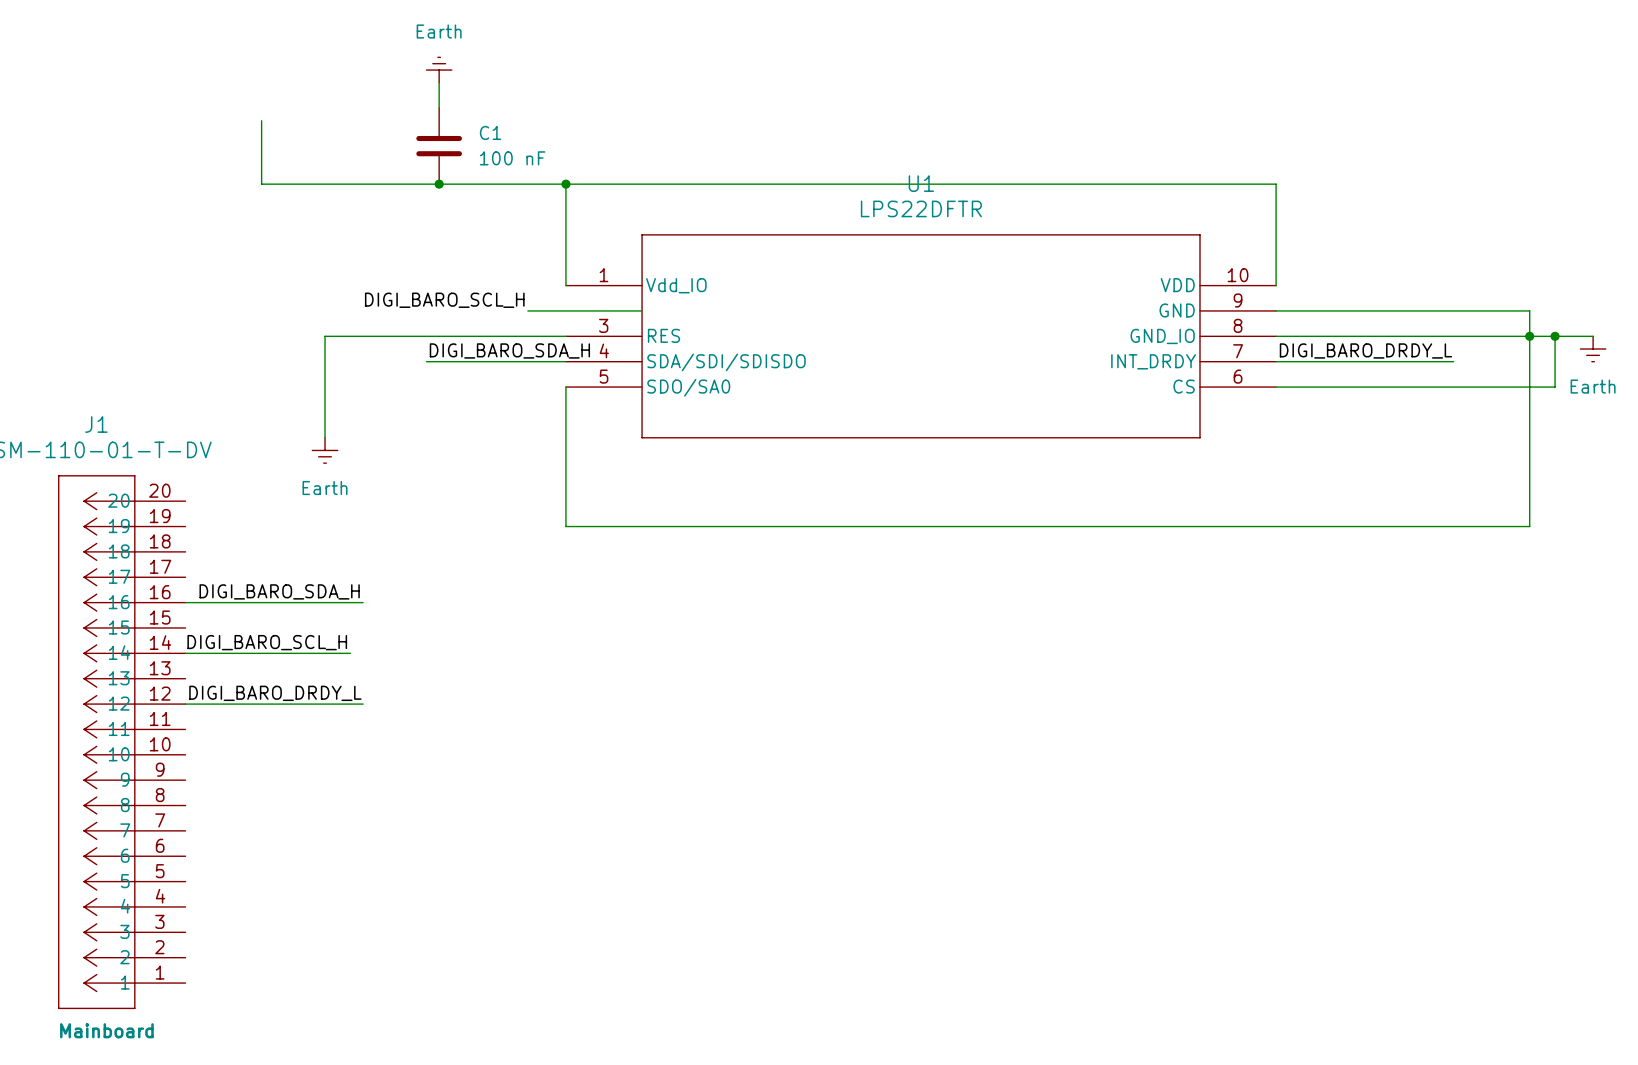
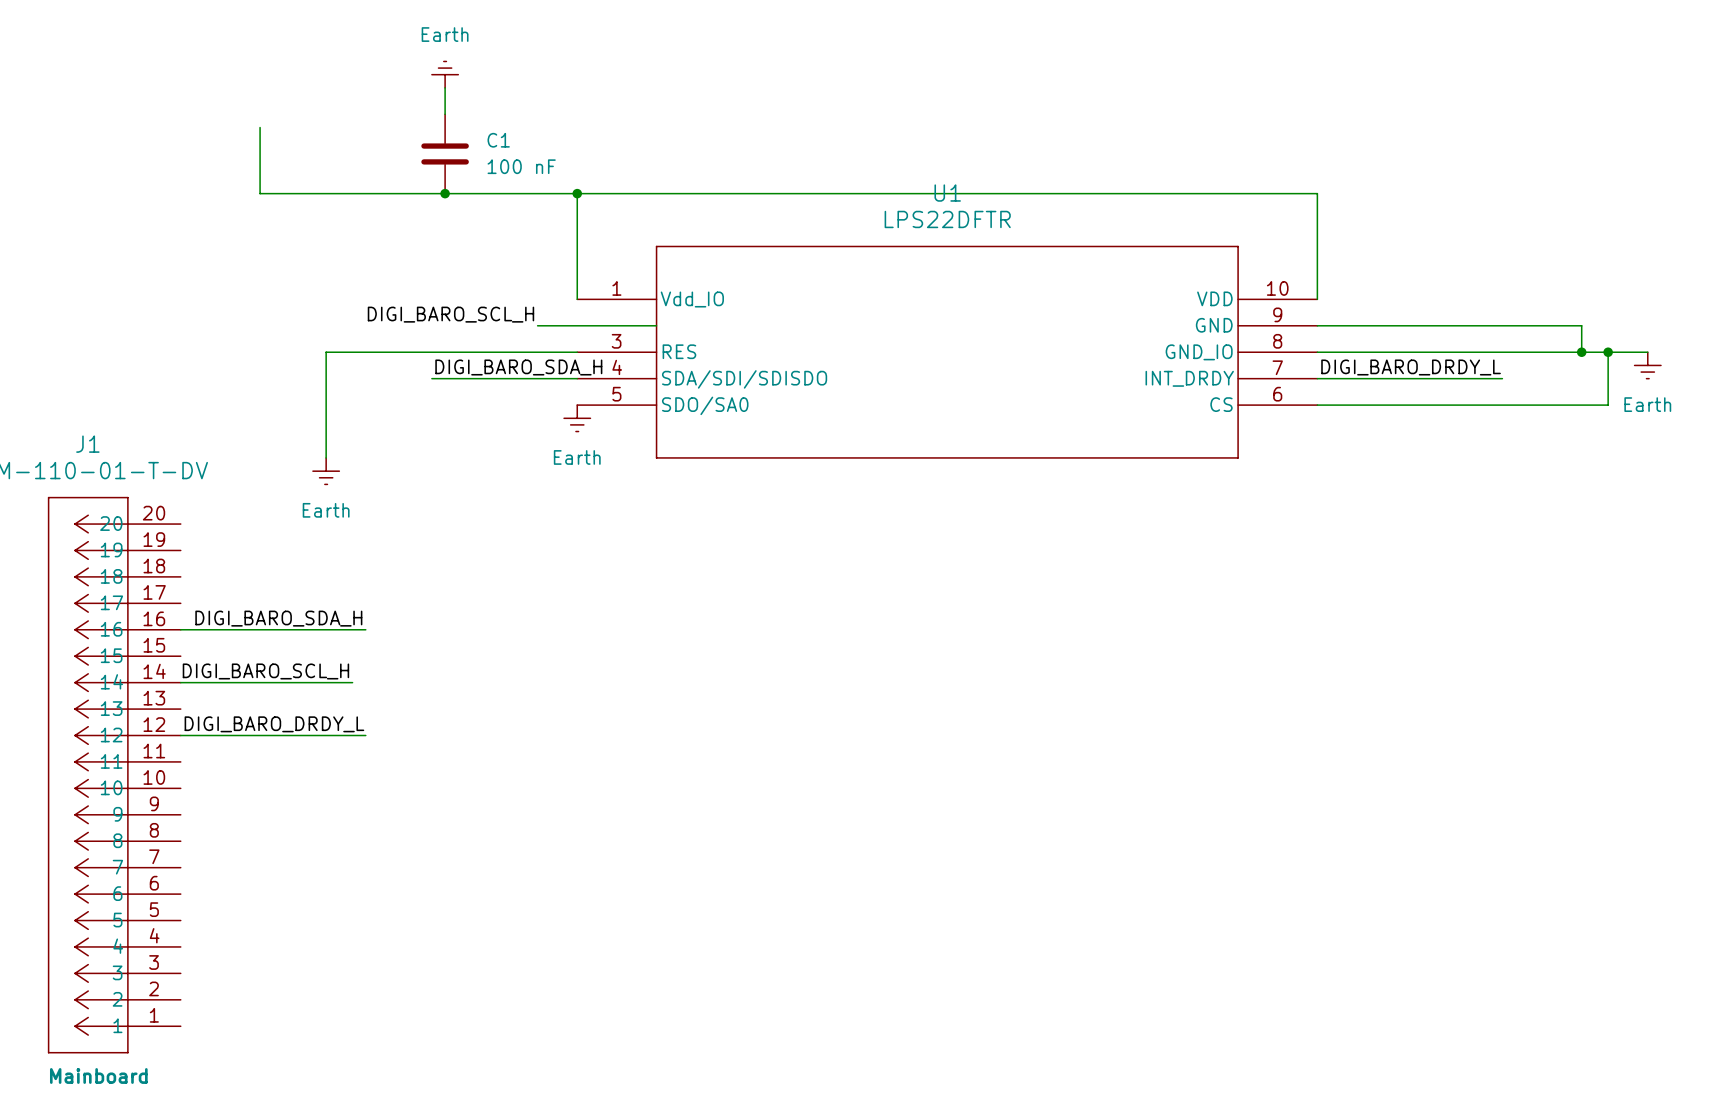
wire: (1529, 336) (1529, 526) (565, 526) (565, 387) -> none
power symbol: none -> Earth (577, 418)

